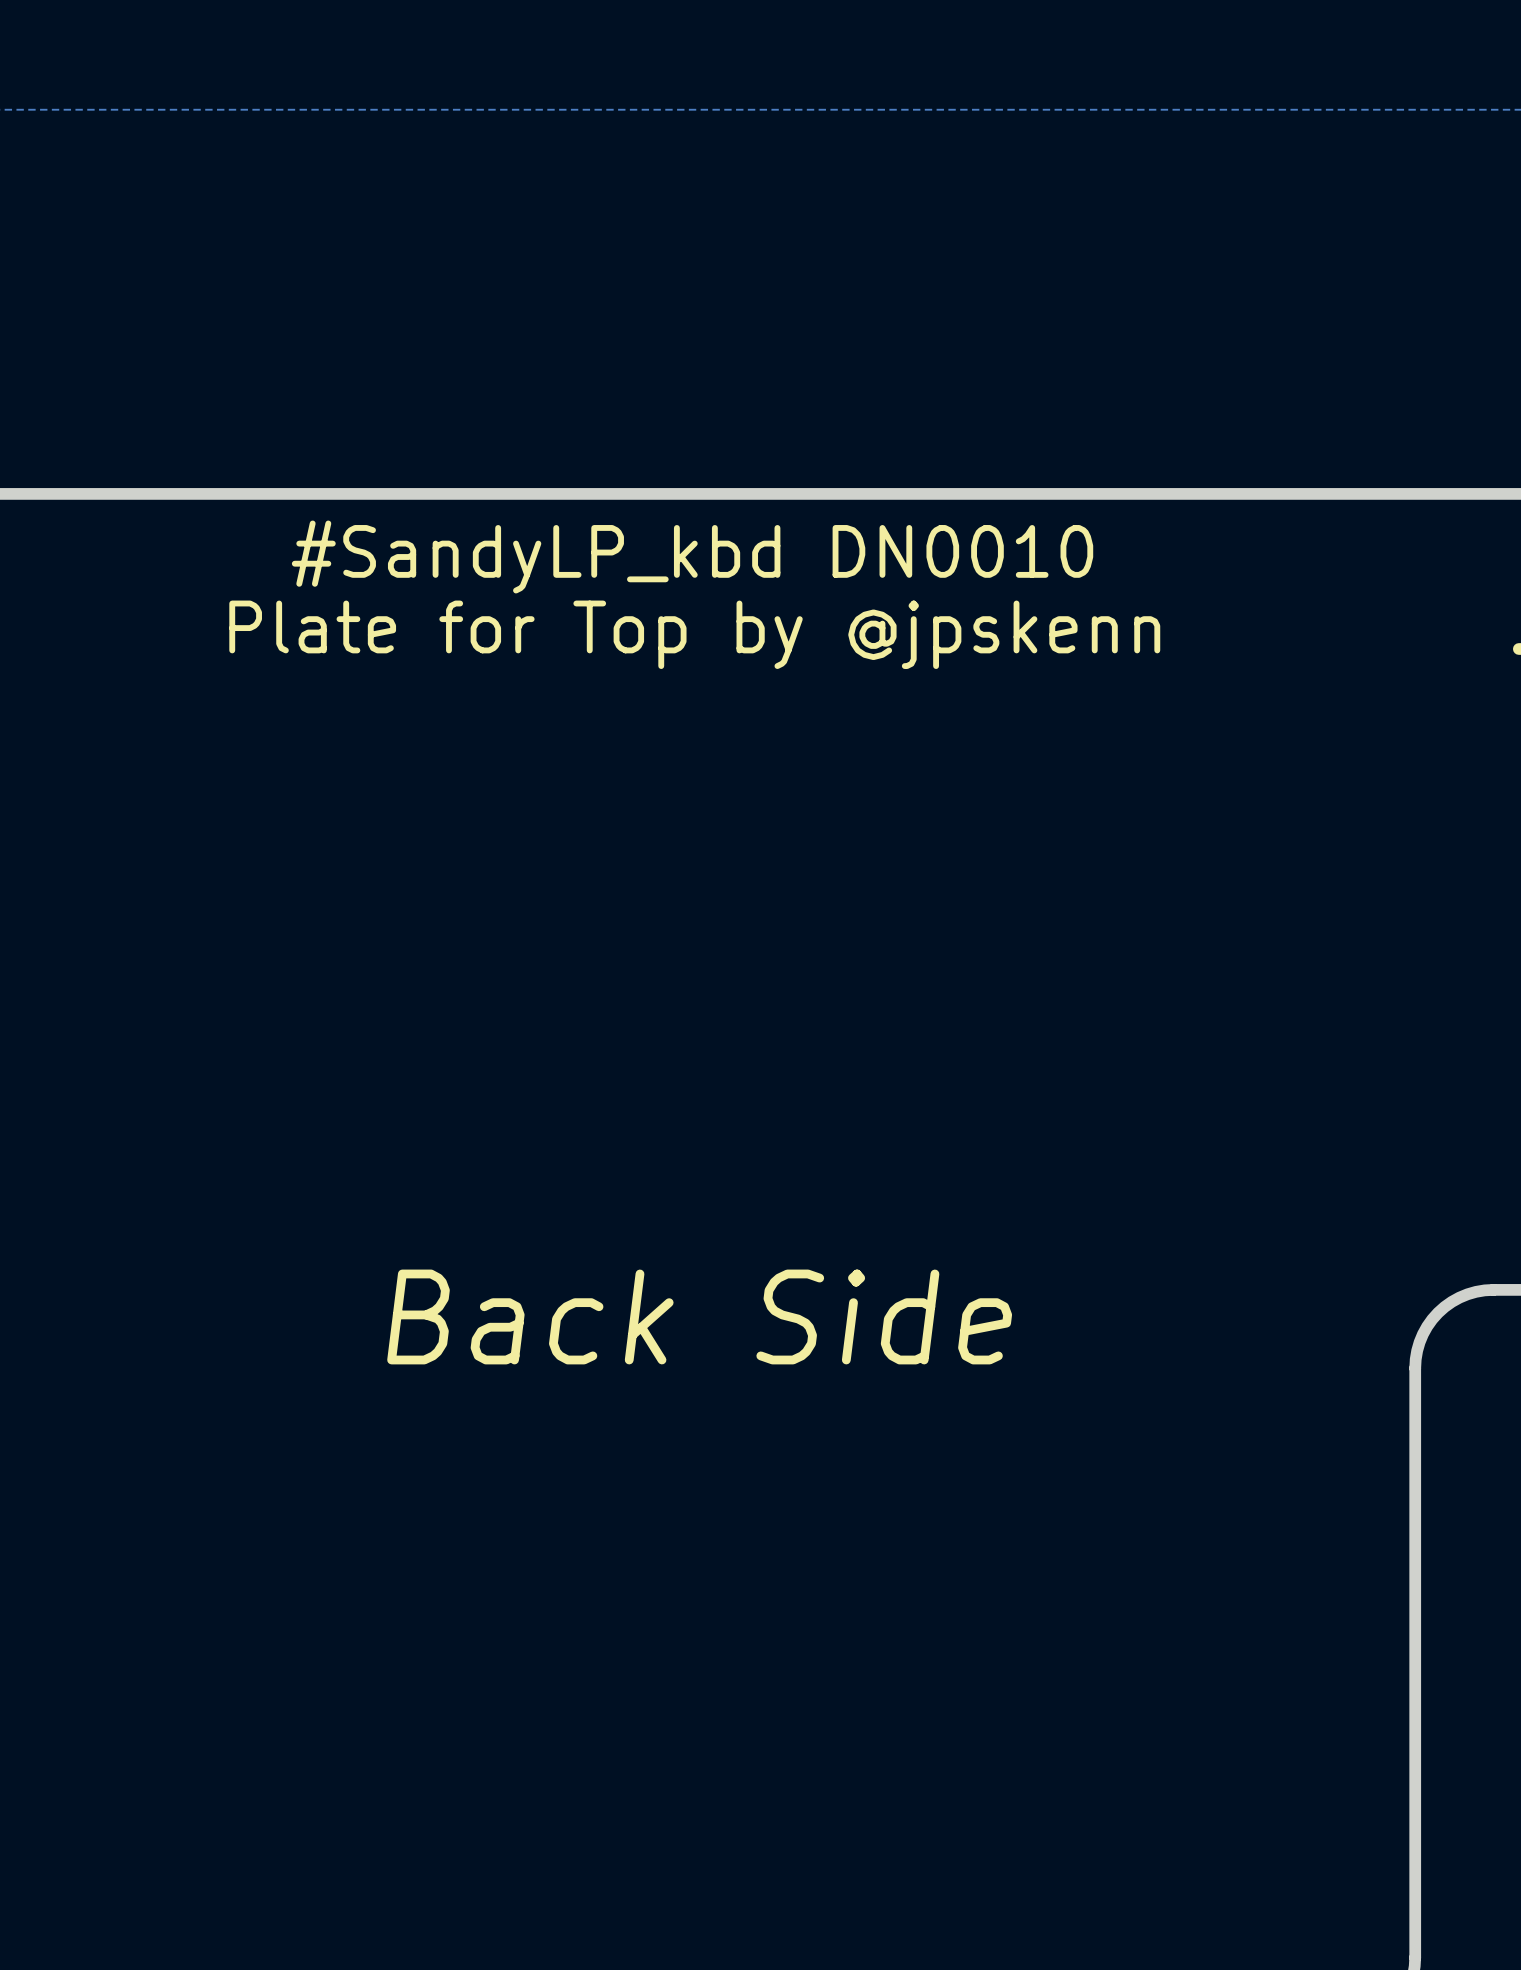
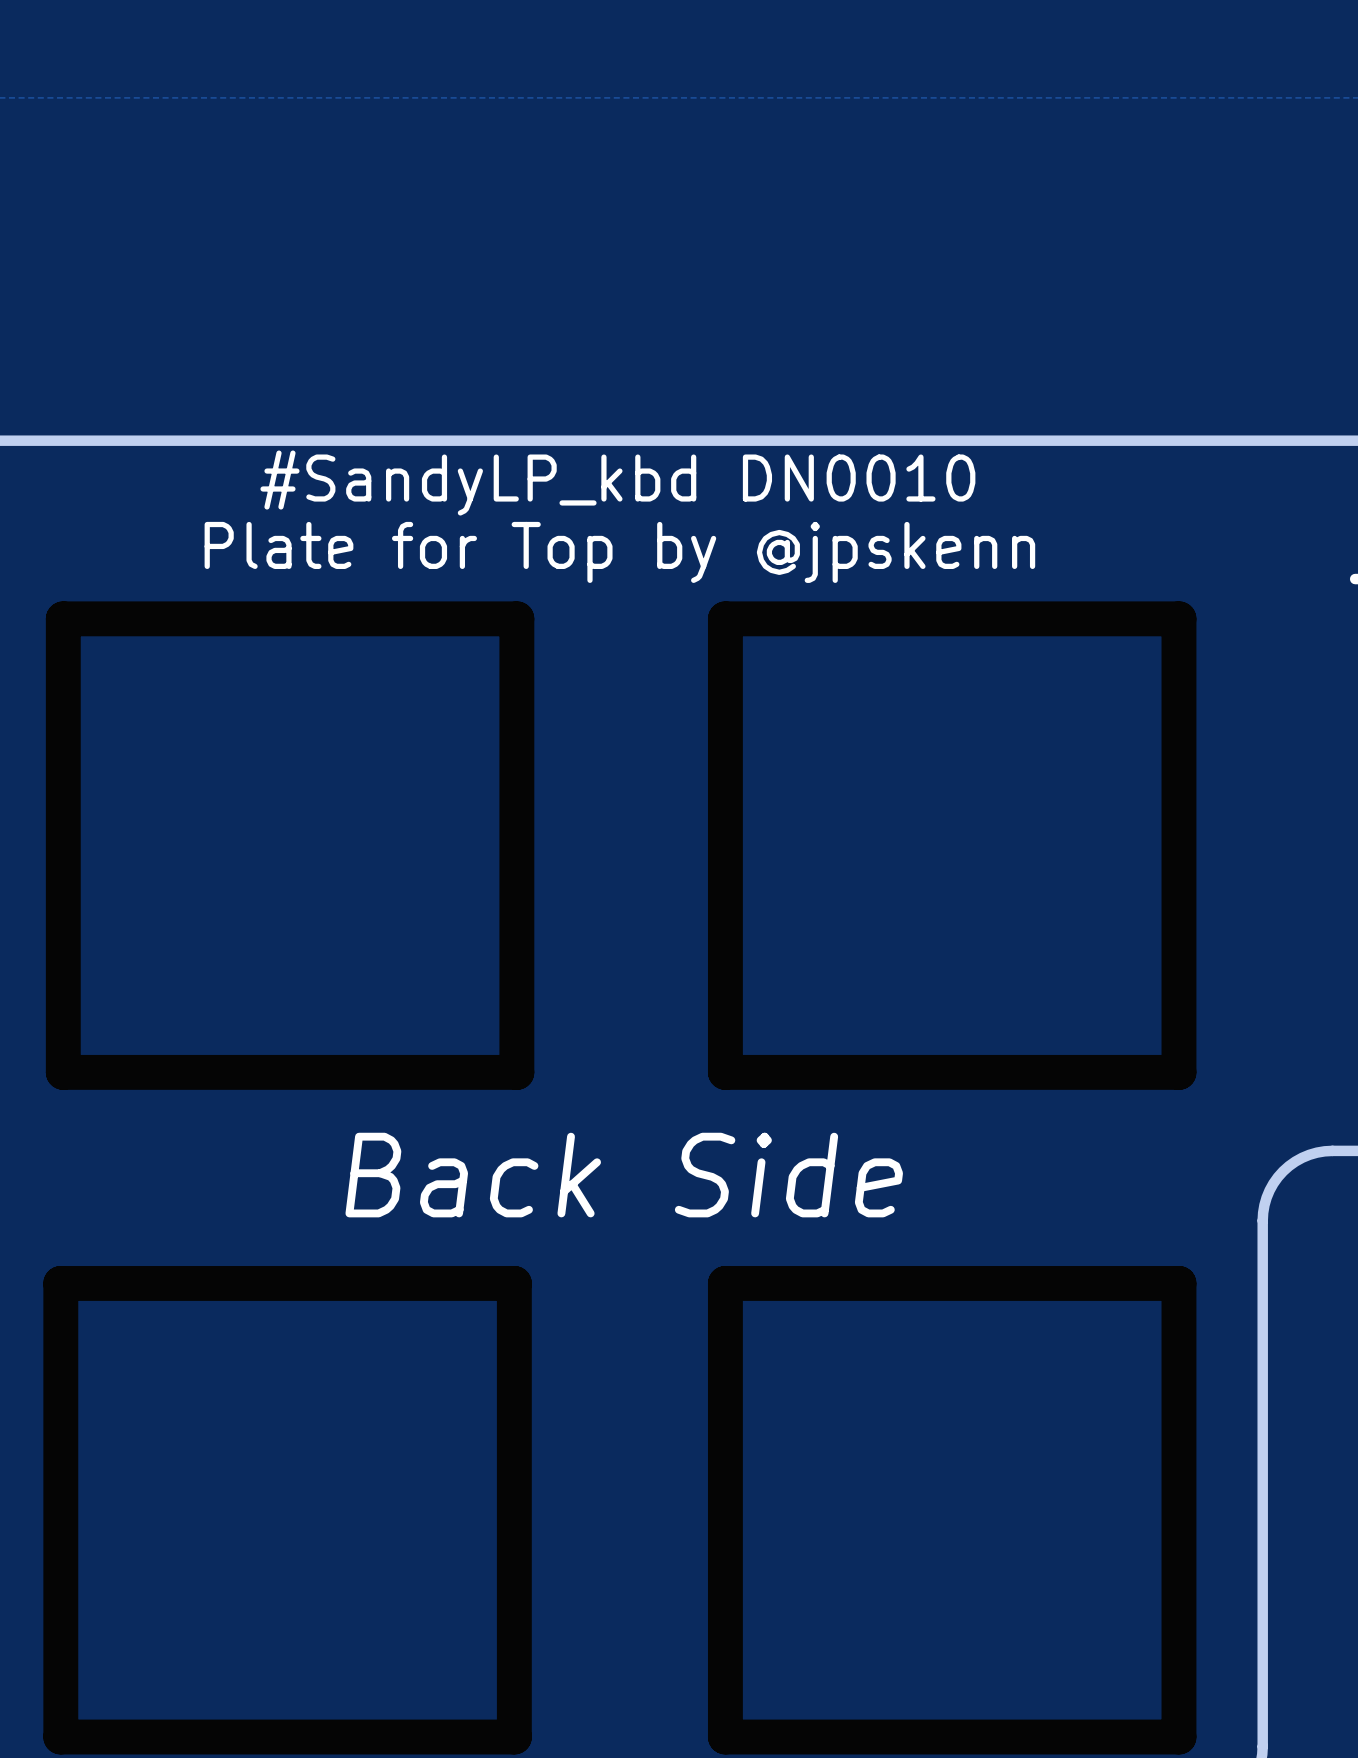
text position: #SandyLP_kbd DN0010 (692, 557) -> #SandyLP_kbd DN0010 (617, 483)
text position: Plate for Top by @jpskenn (694, 634) -> Plate for Top by @jpskenn (619, 552)

